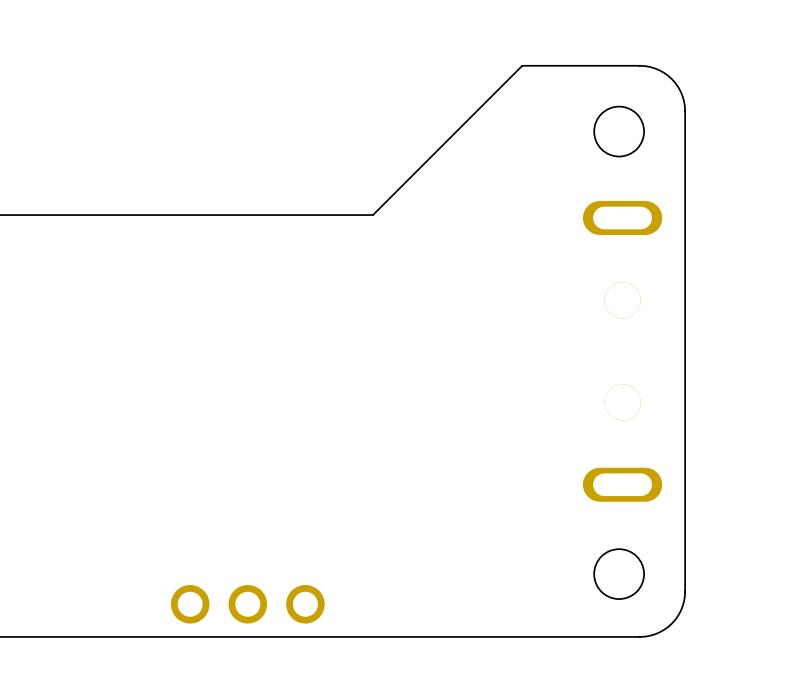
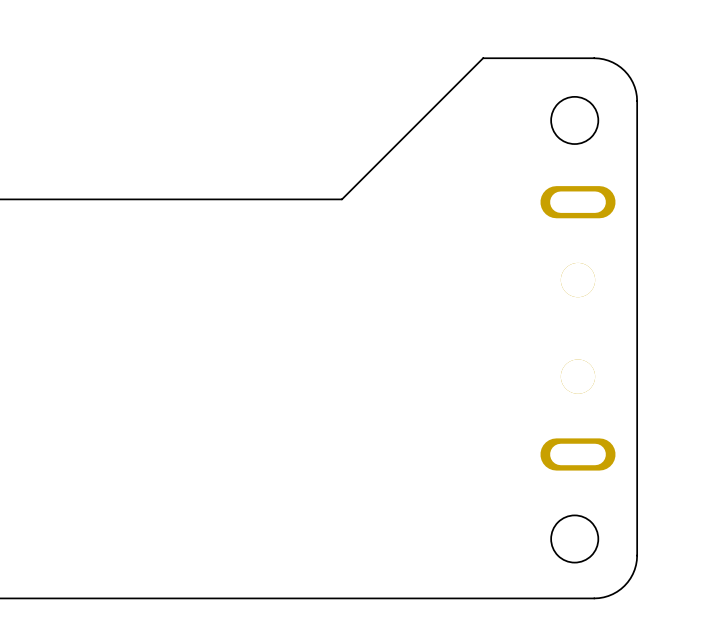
part: (247, 604) -> none

